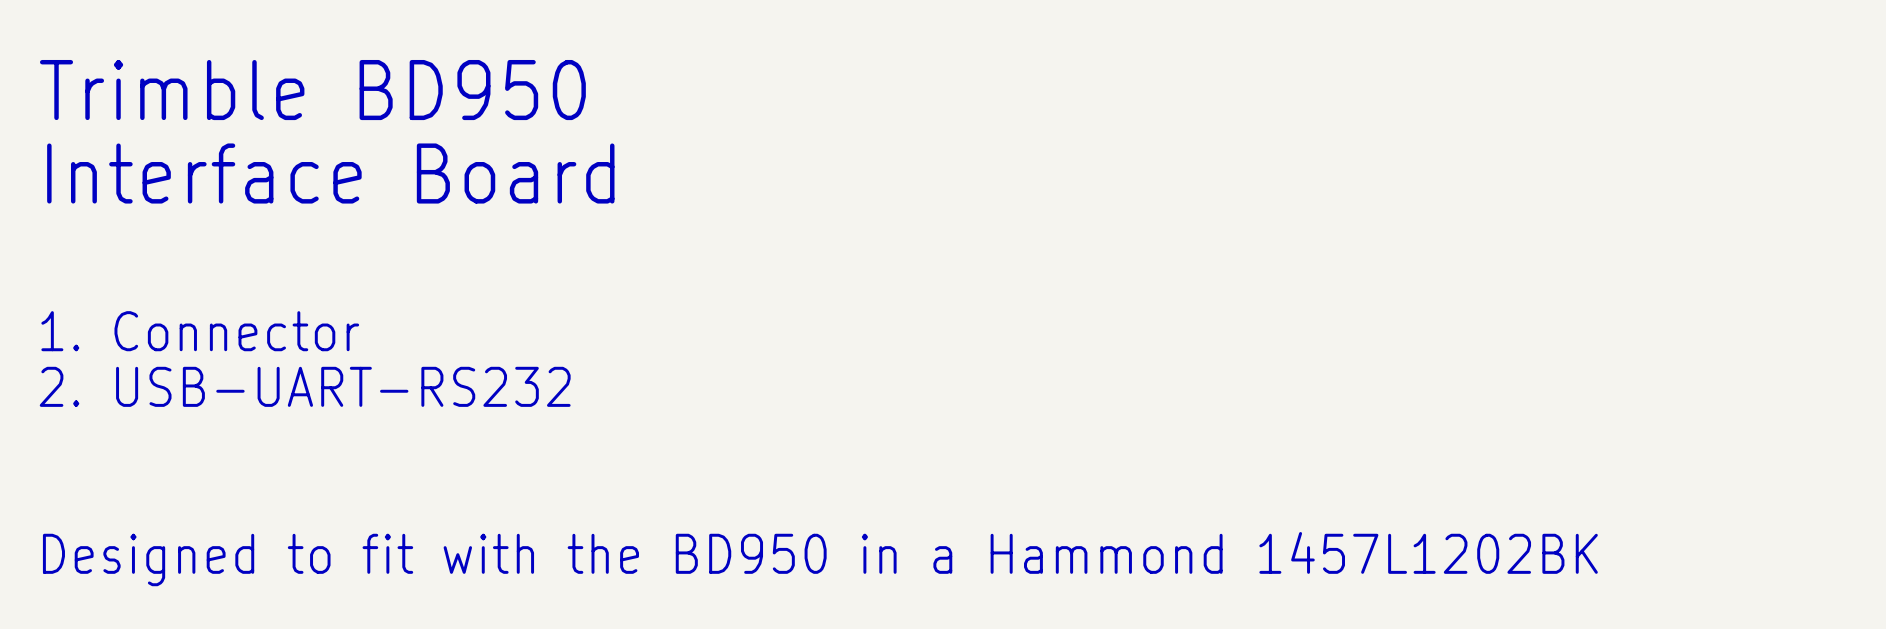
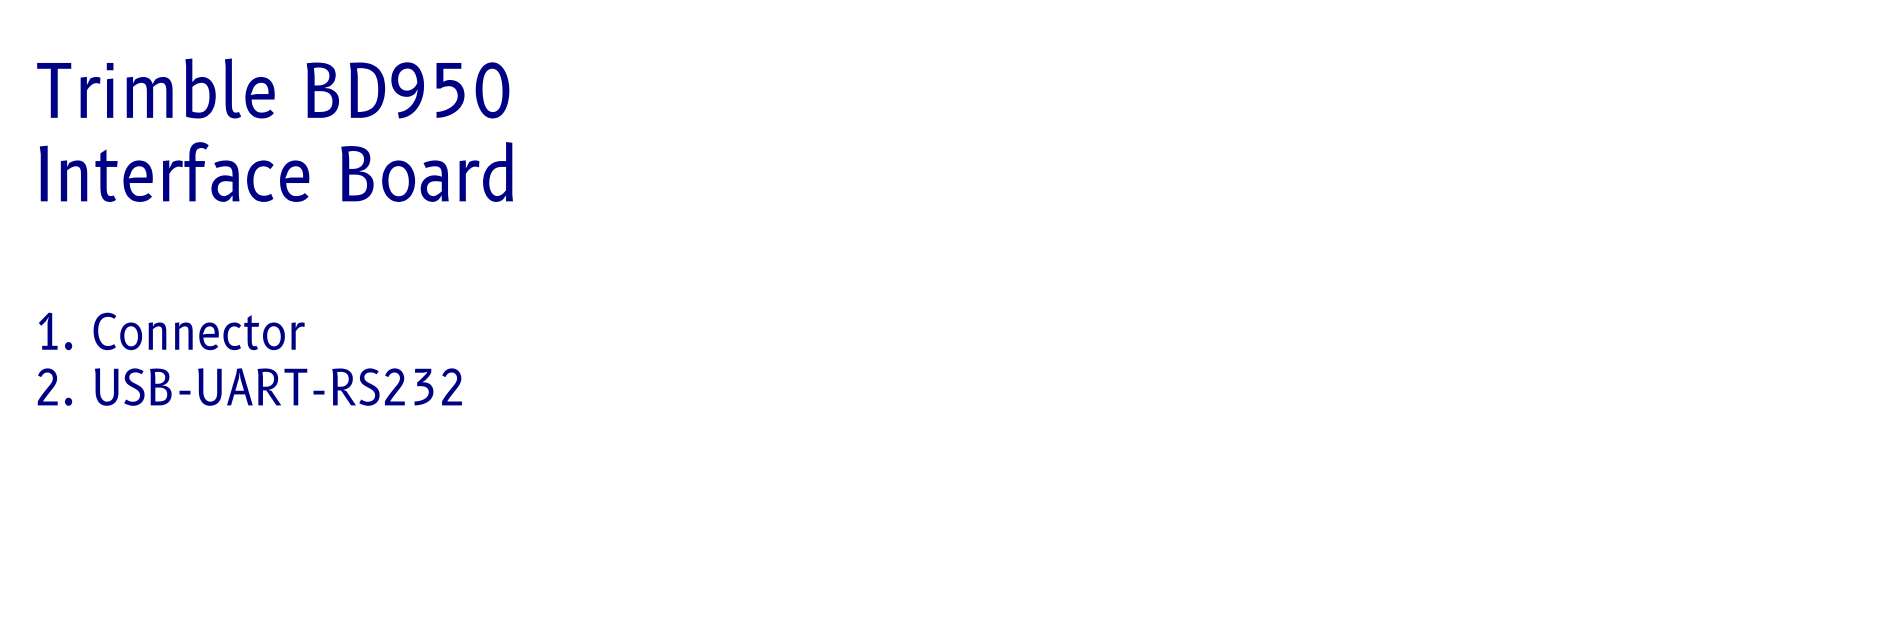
text: Designed to fit with the BD950 in a Hammond 1457L1202BK (820, 559) -> none

